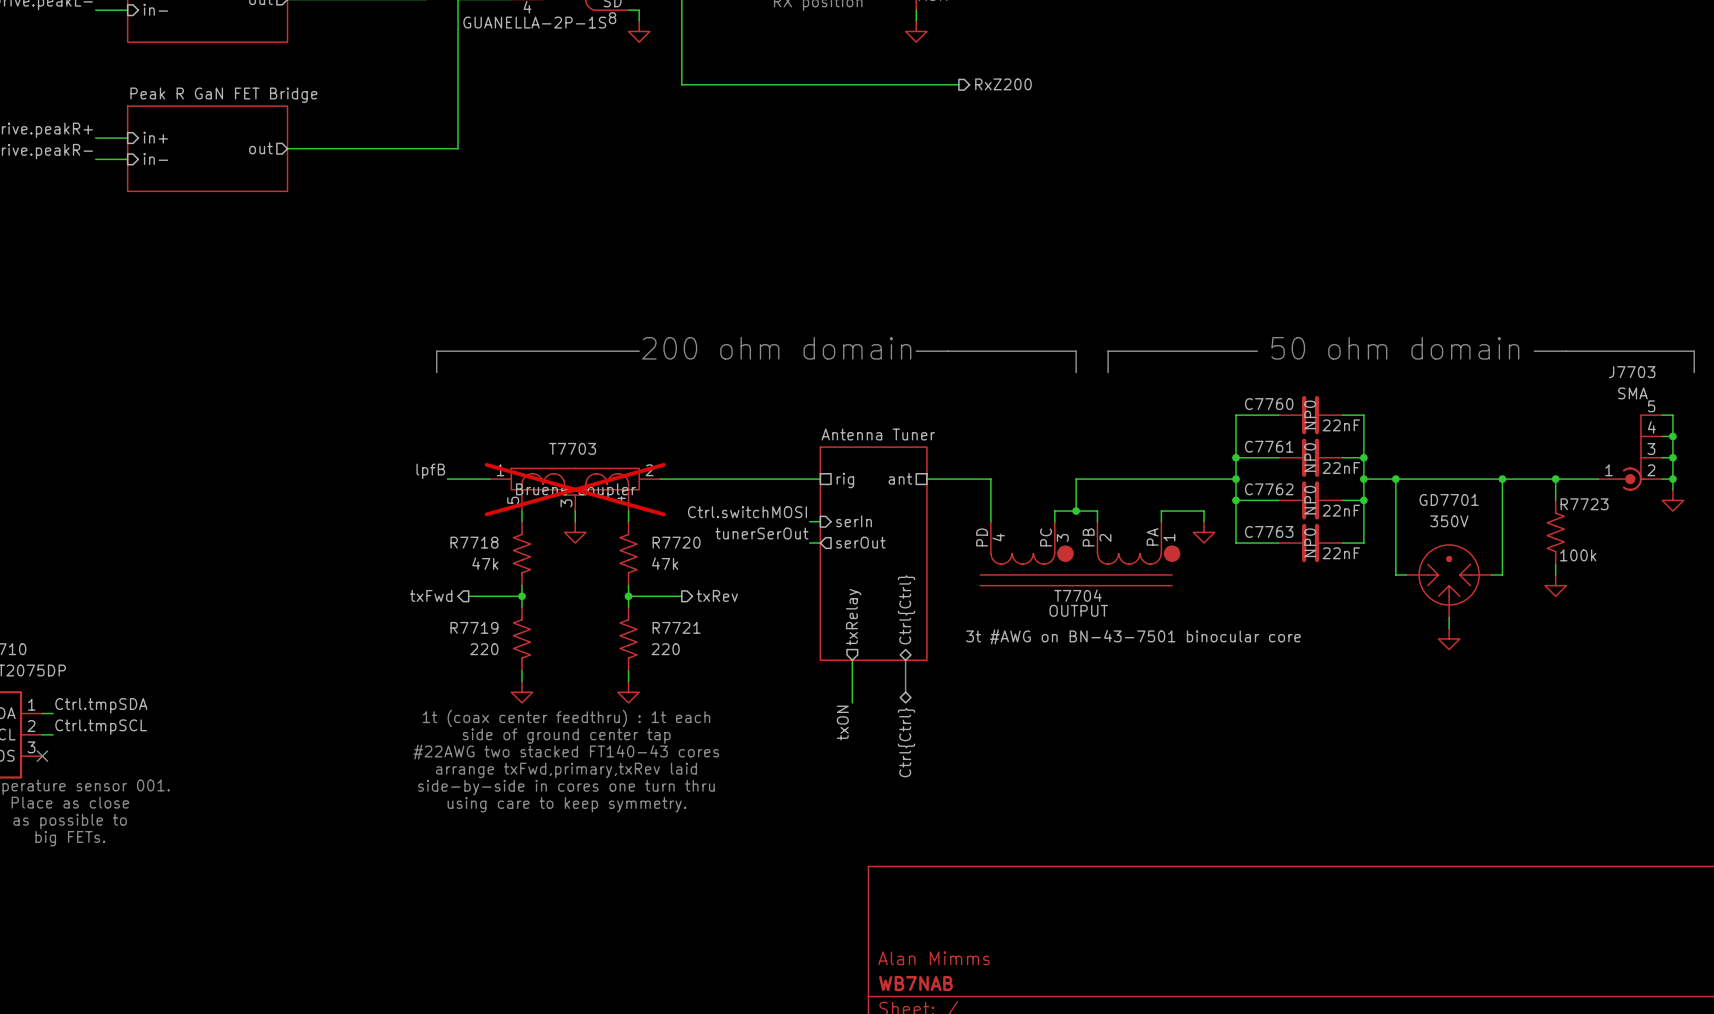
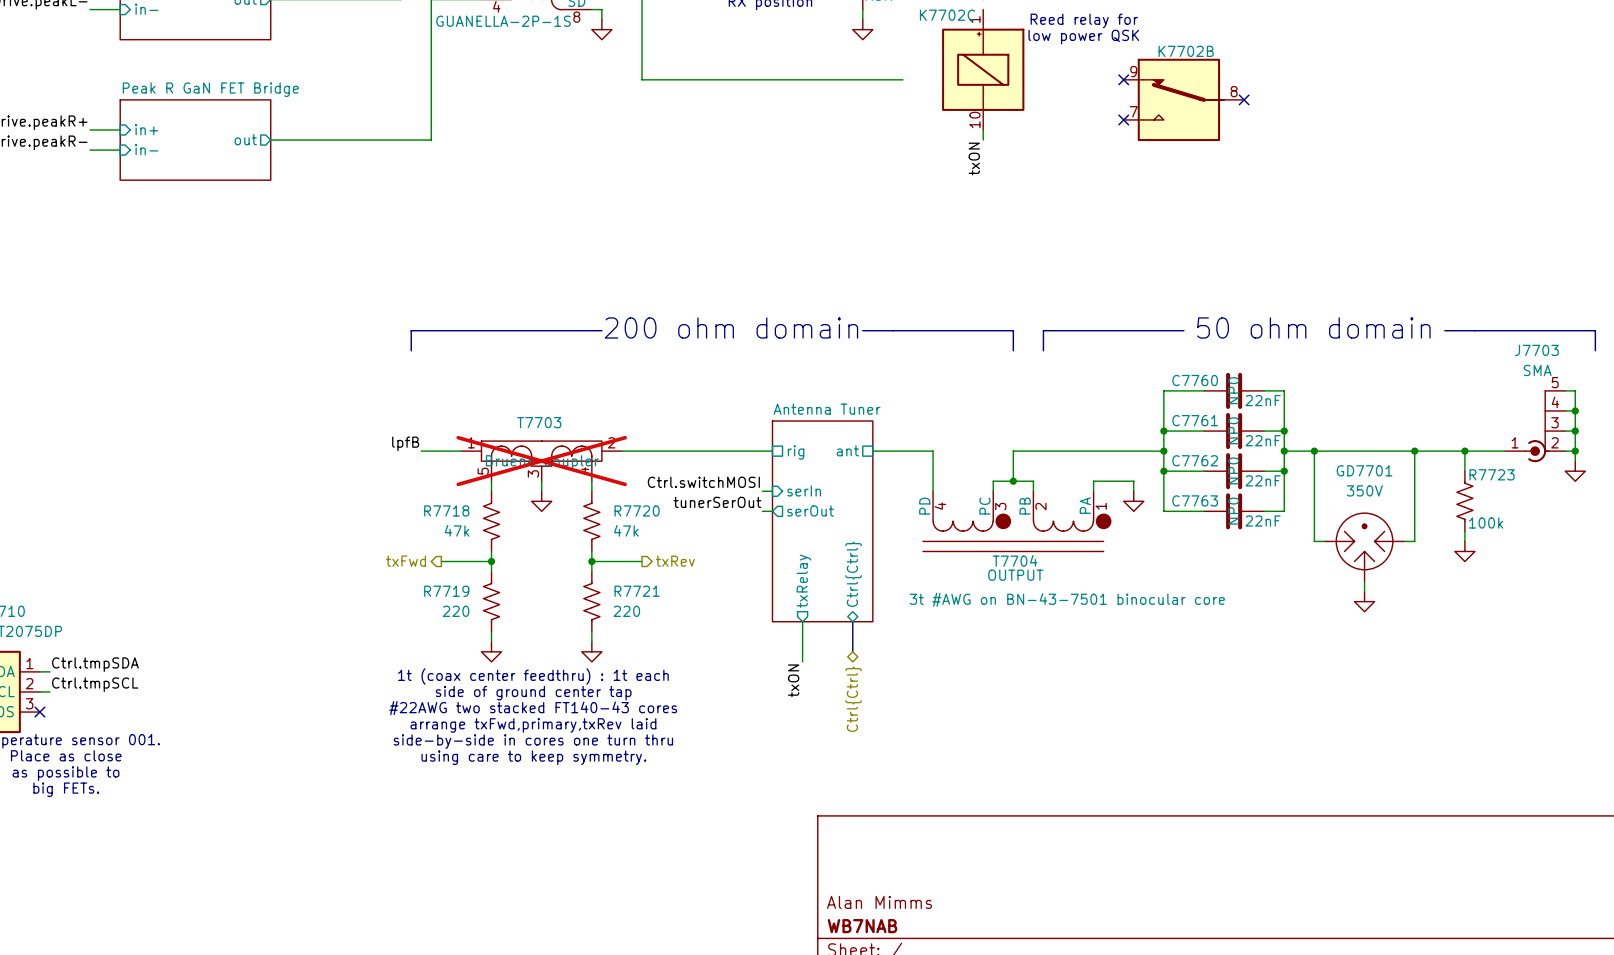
text: none -> Reed relay for (1084, 20)
text: none -> low power QSK (1083, 37)
K7702C: none -> (983, 69)
hierarchical label: RxZ200 (1003, 84) -> none
no-connect mark: none -> (1123, 79)
K7702B: none -> (1183, 99)
no-connect mark: none -> (1244, 99)
no-connect mark: none -> (1123, 119)
wire: none -> (983, 130) (983, 140)
label: none -> txON (974, 158)

